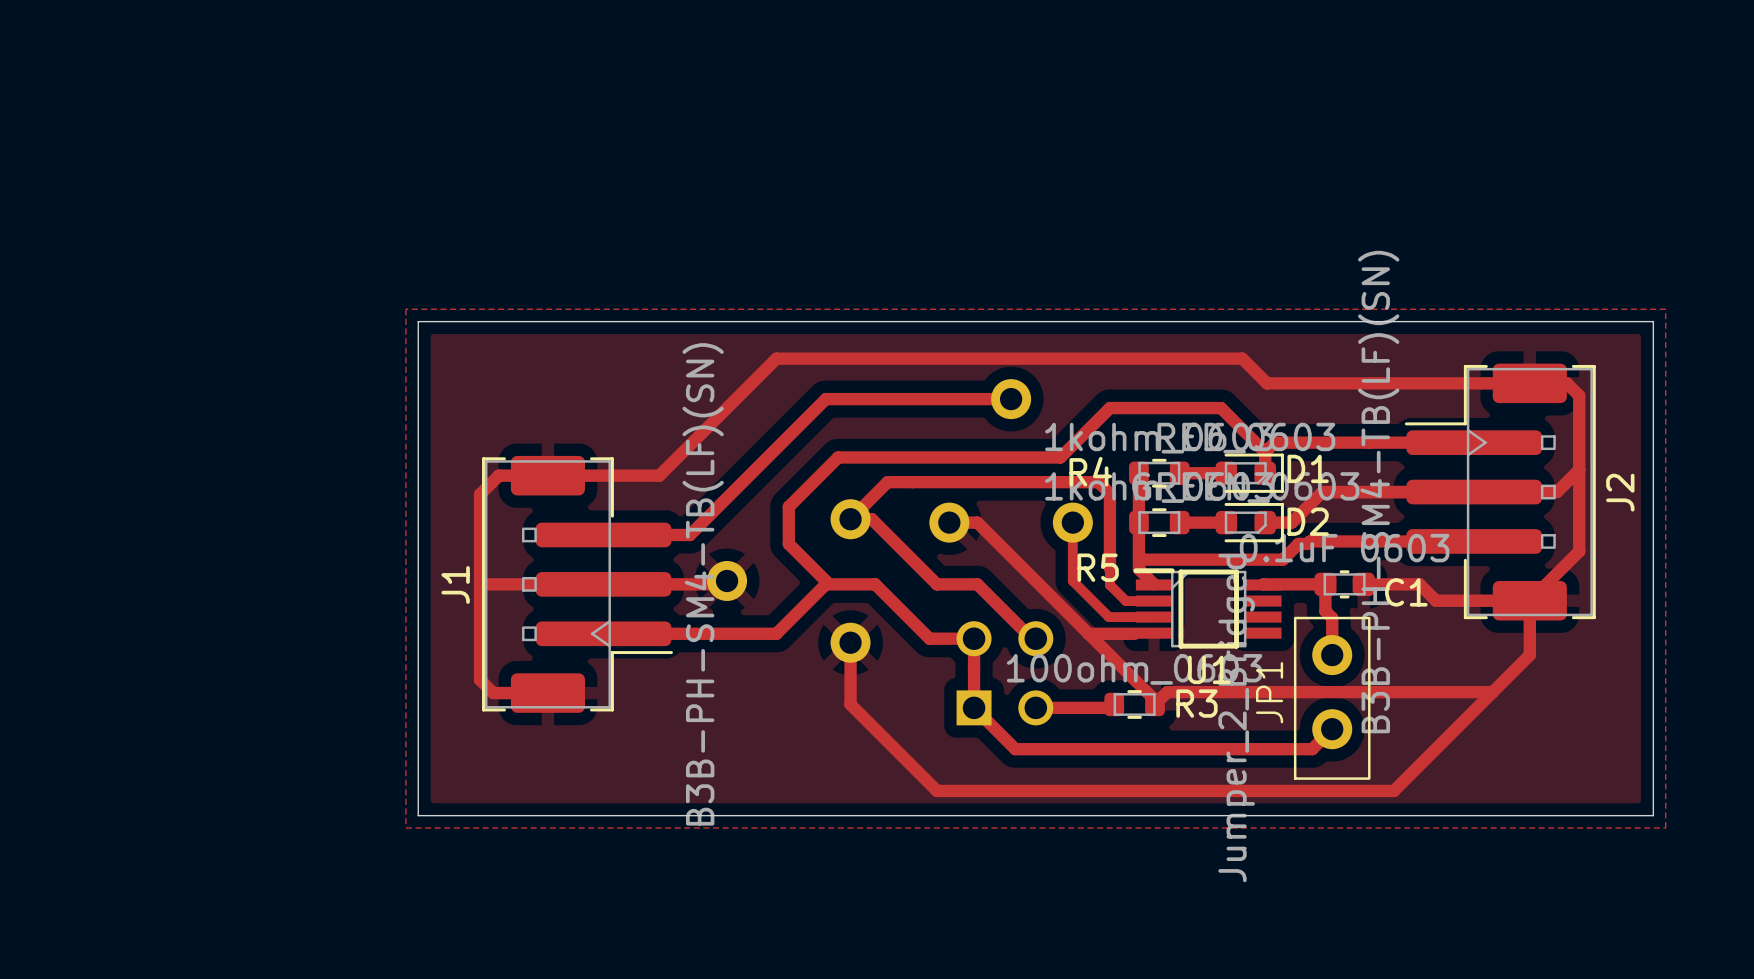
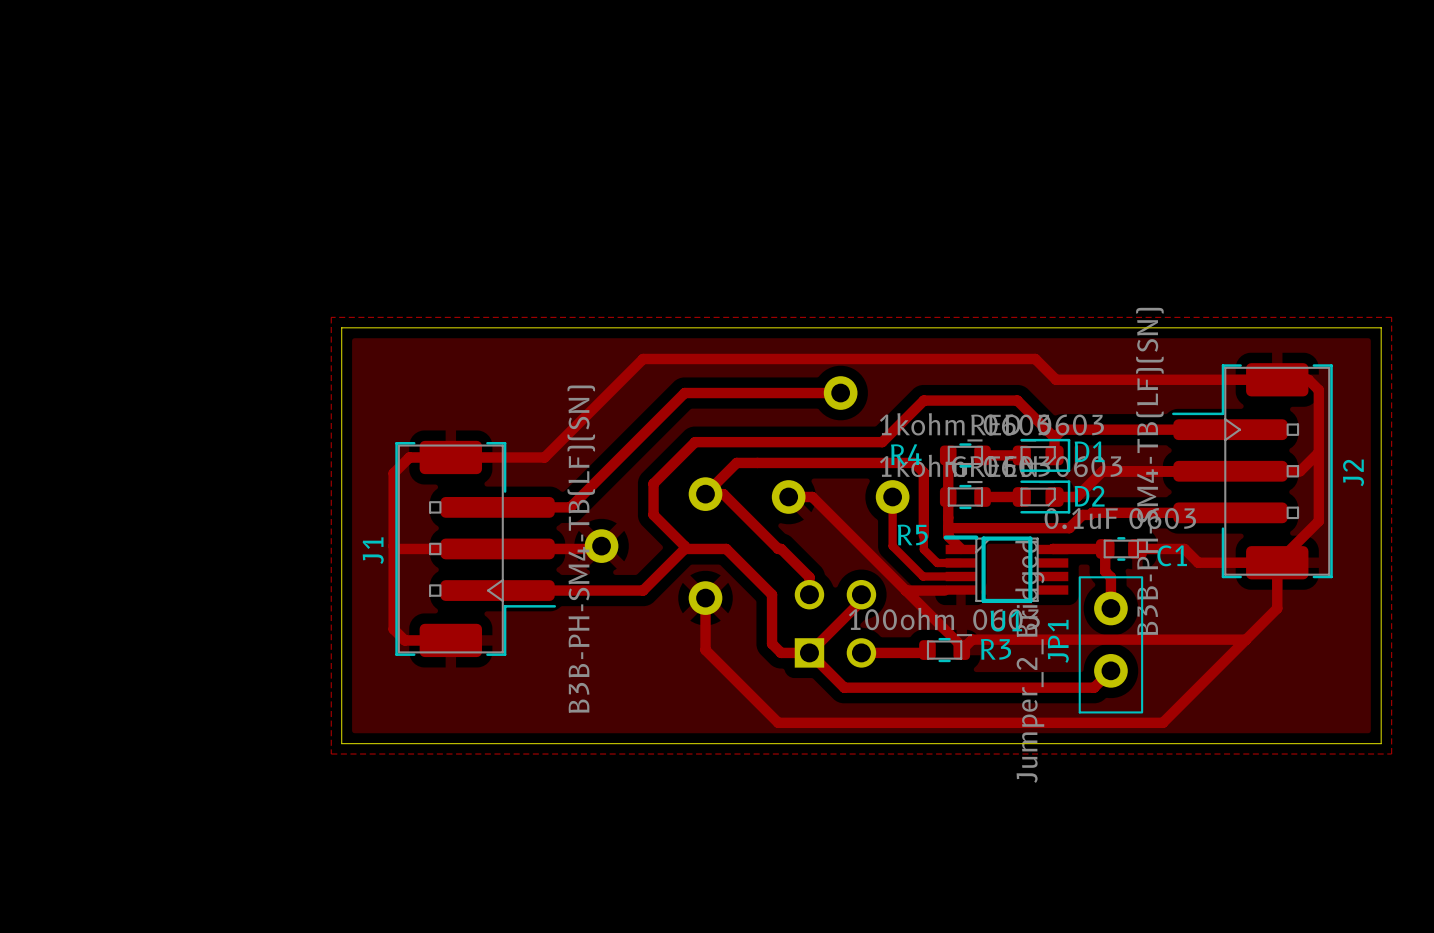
track: (940, 584) (977, 584) (1031, 638) -> (781, 548) (809, 577) (809, 594)
track: (929, 638) (974, 638) (974, 707) -> (772, 594) (772, 643) (781, 652) (809, 652) (861, 600) (861, 594)

